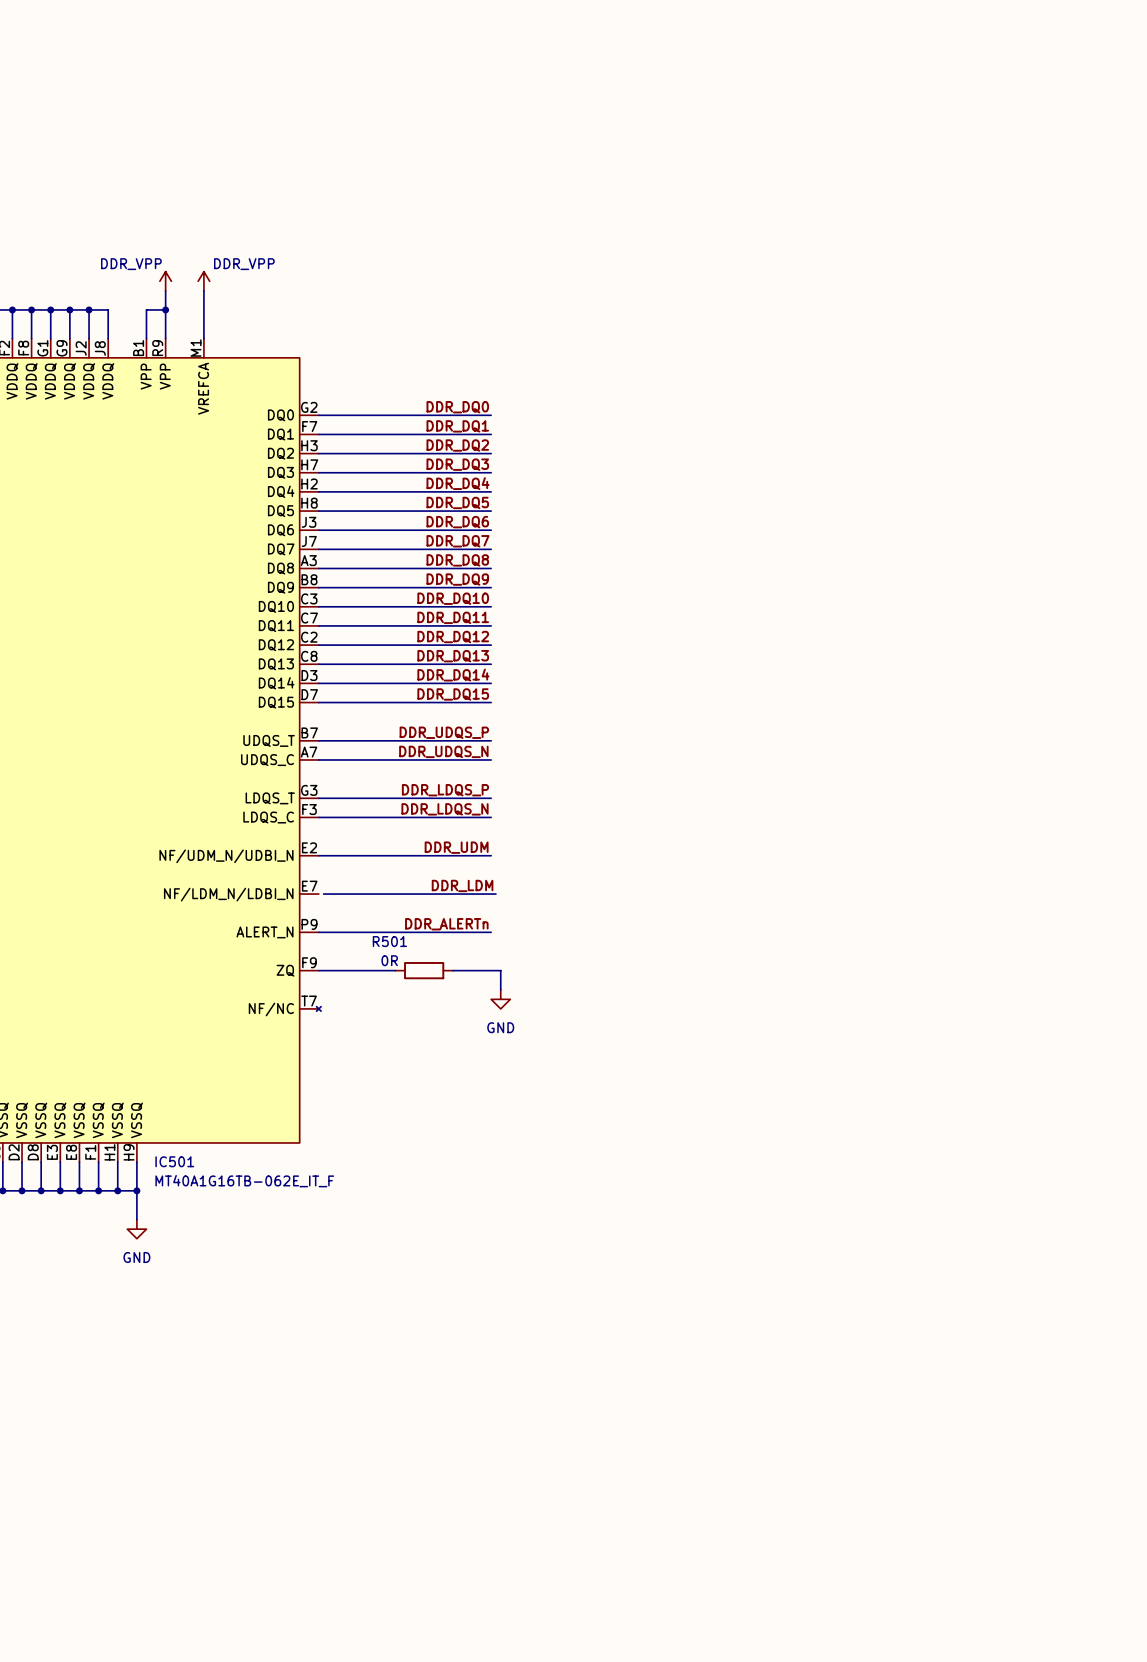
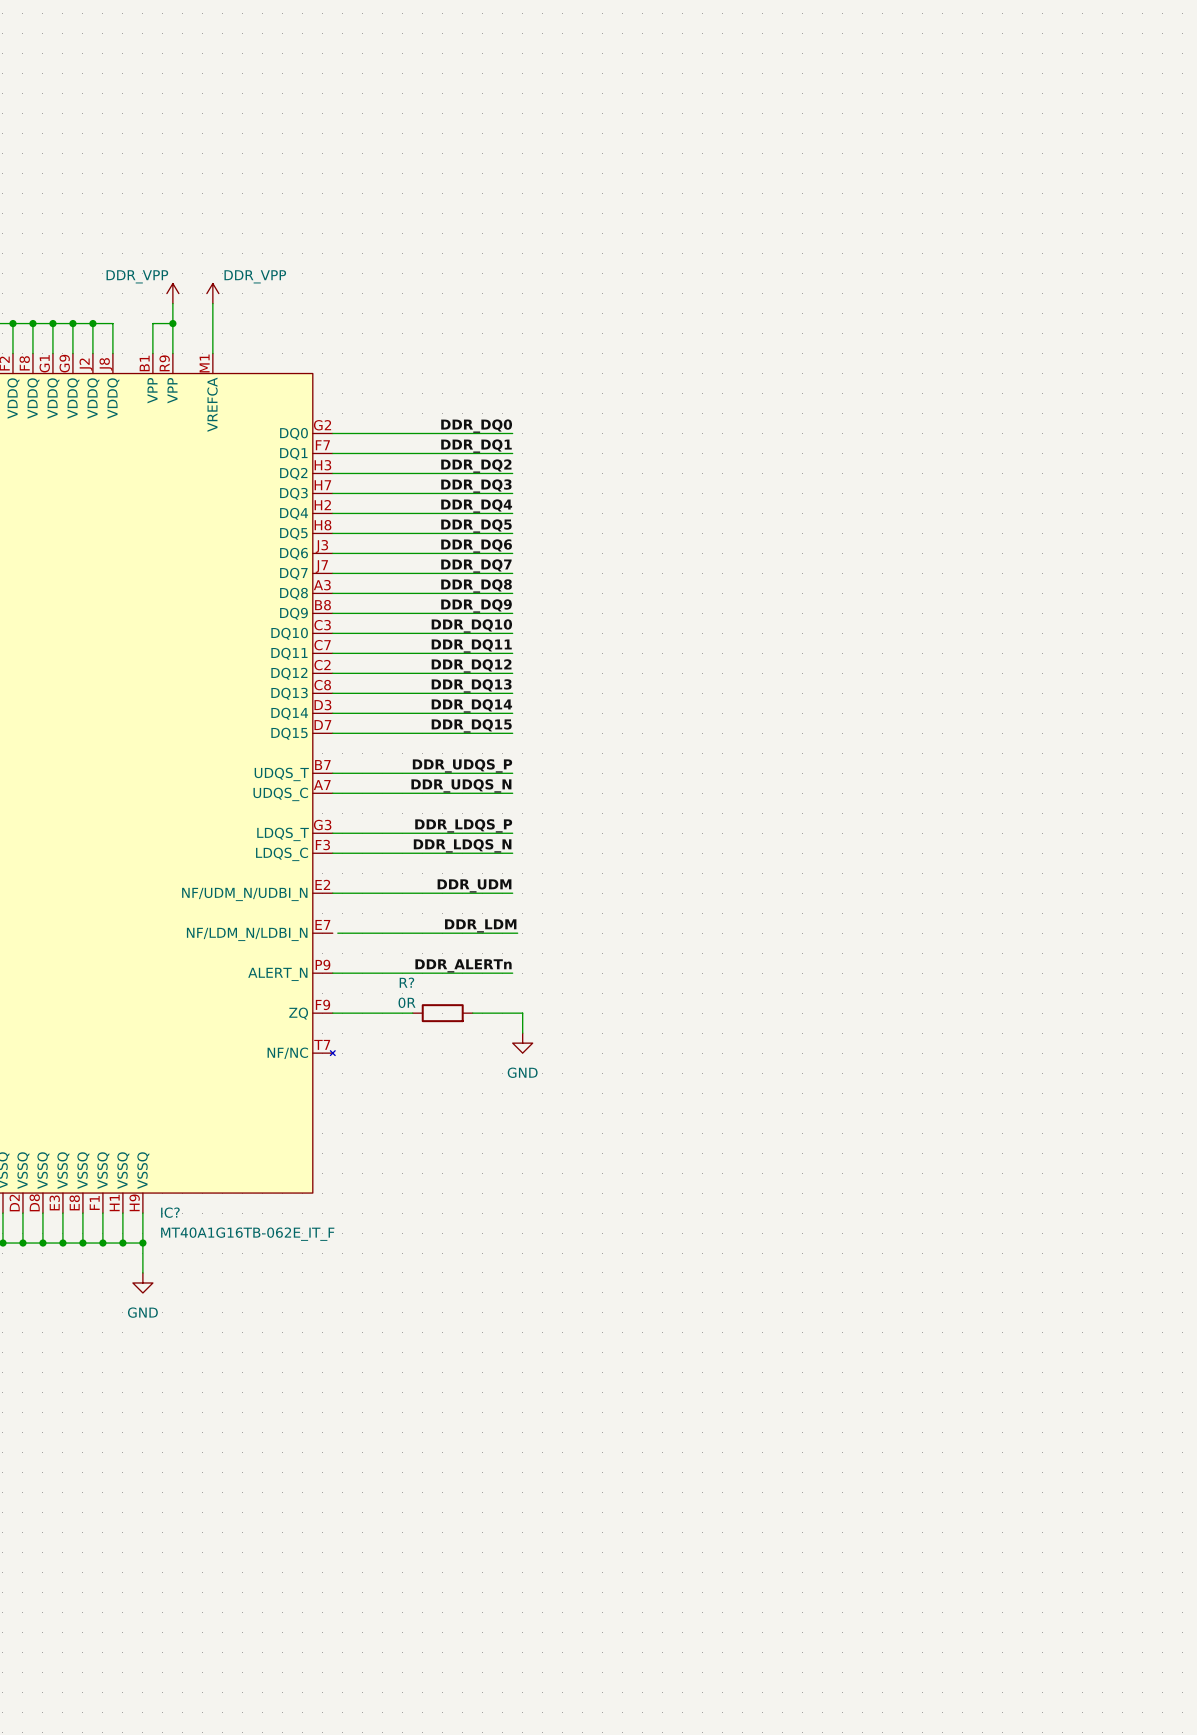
R501 name: R501 (389, 941) -> R? (406, 982)
IC501 name: IC501 (174, 1161) -> IC? (170, 1212)

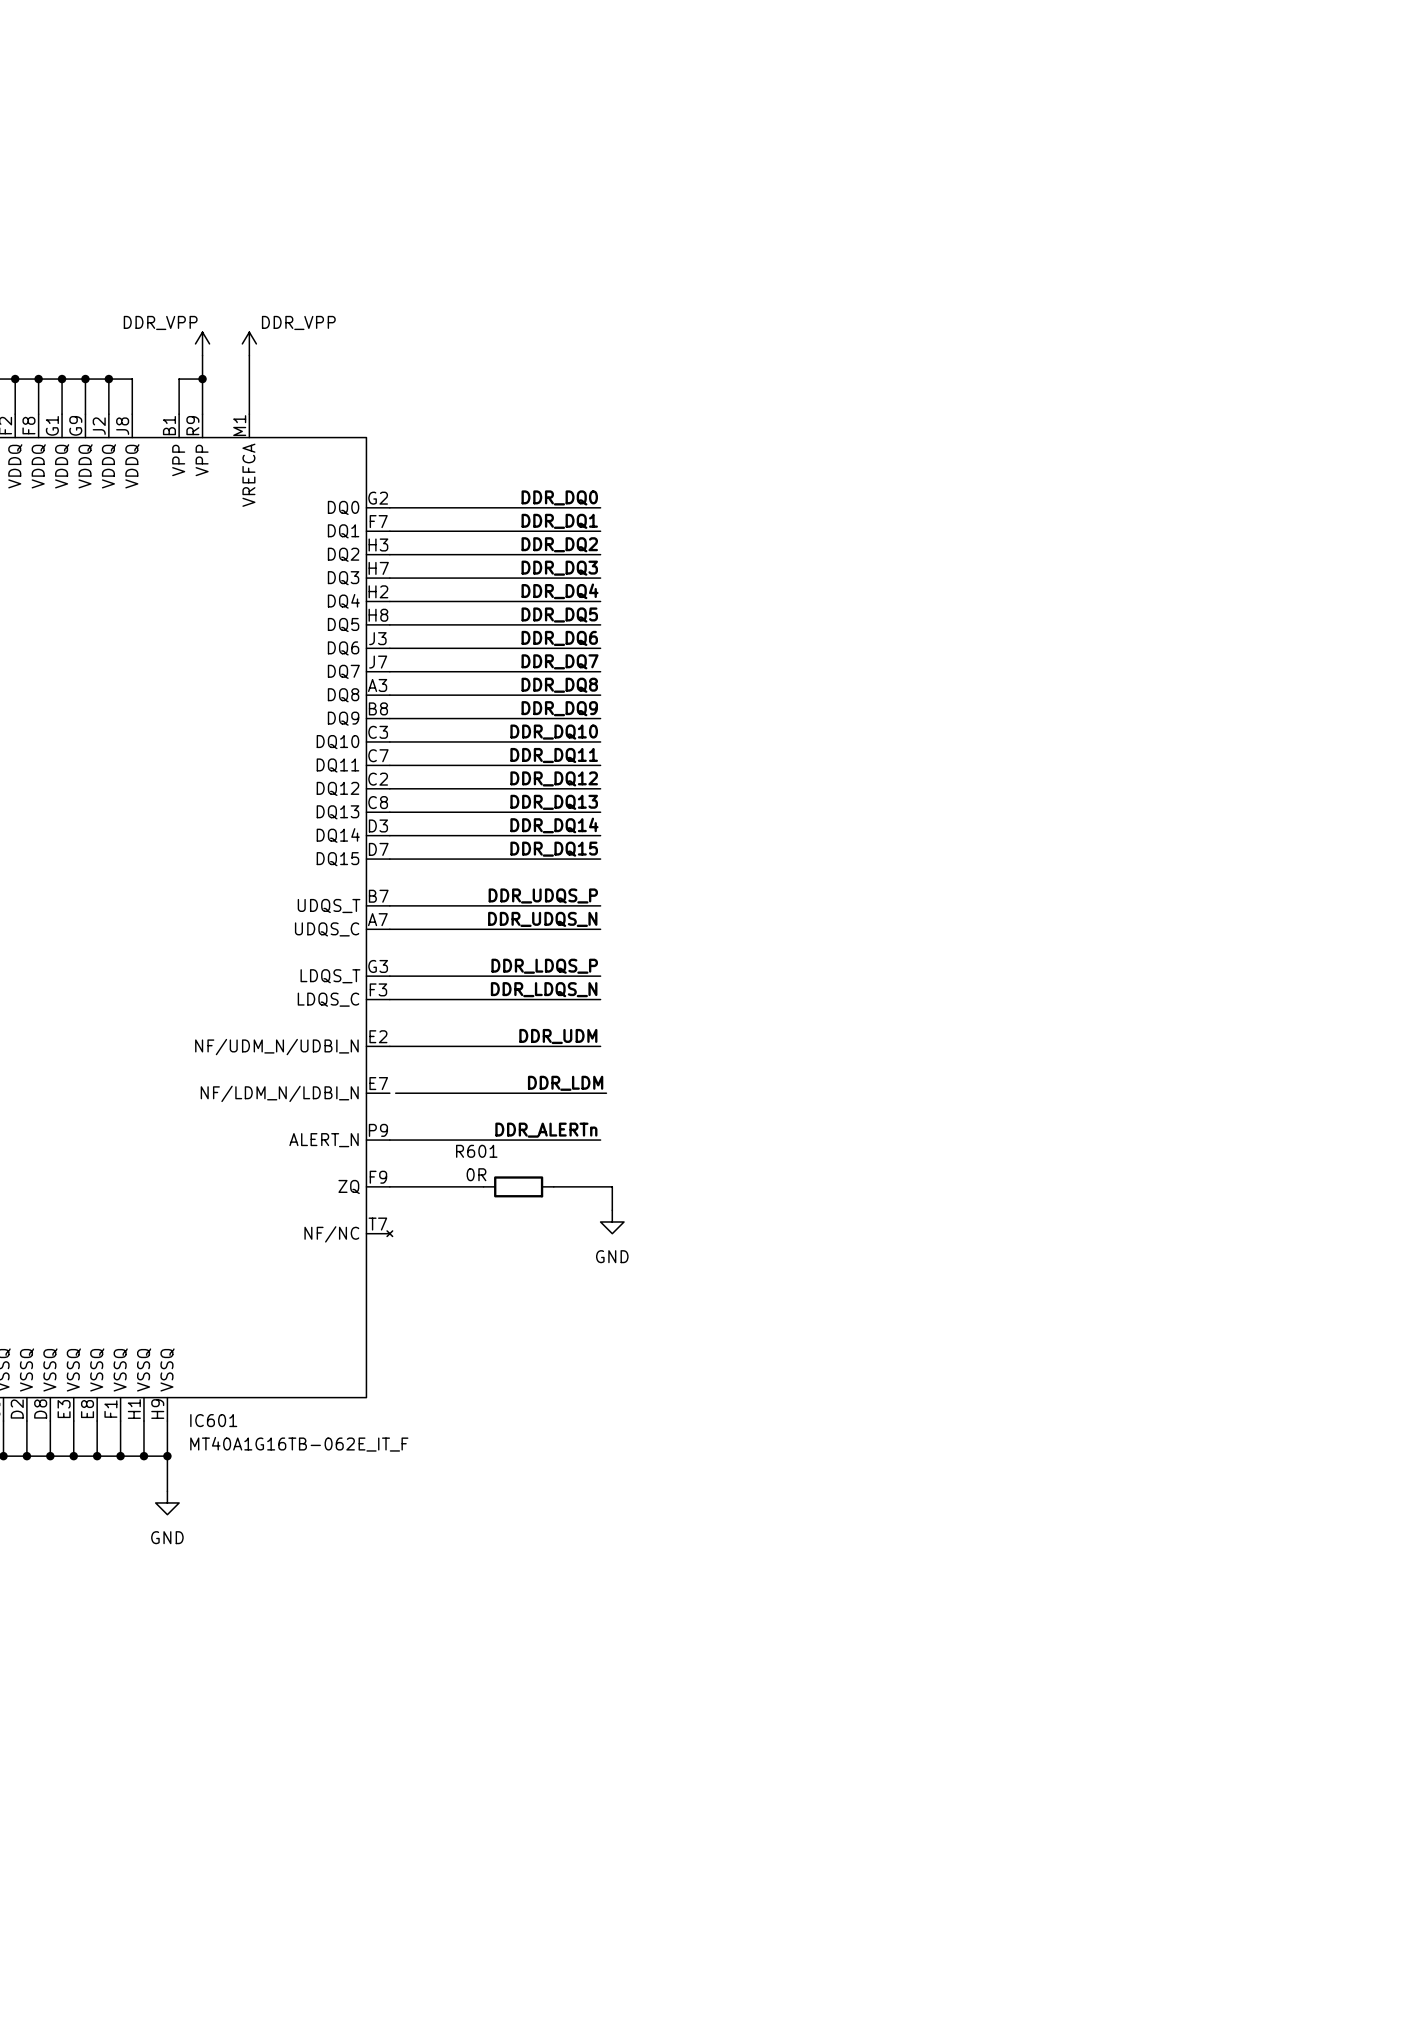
R? name: R? (406, 982) -> R601 (476, 1151)
IC? name: IC? (170, 1212) -> IC601 (213, 1420)

